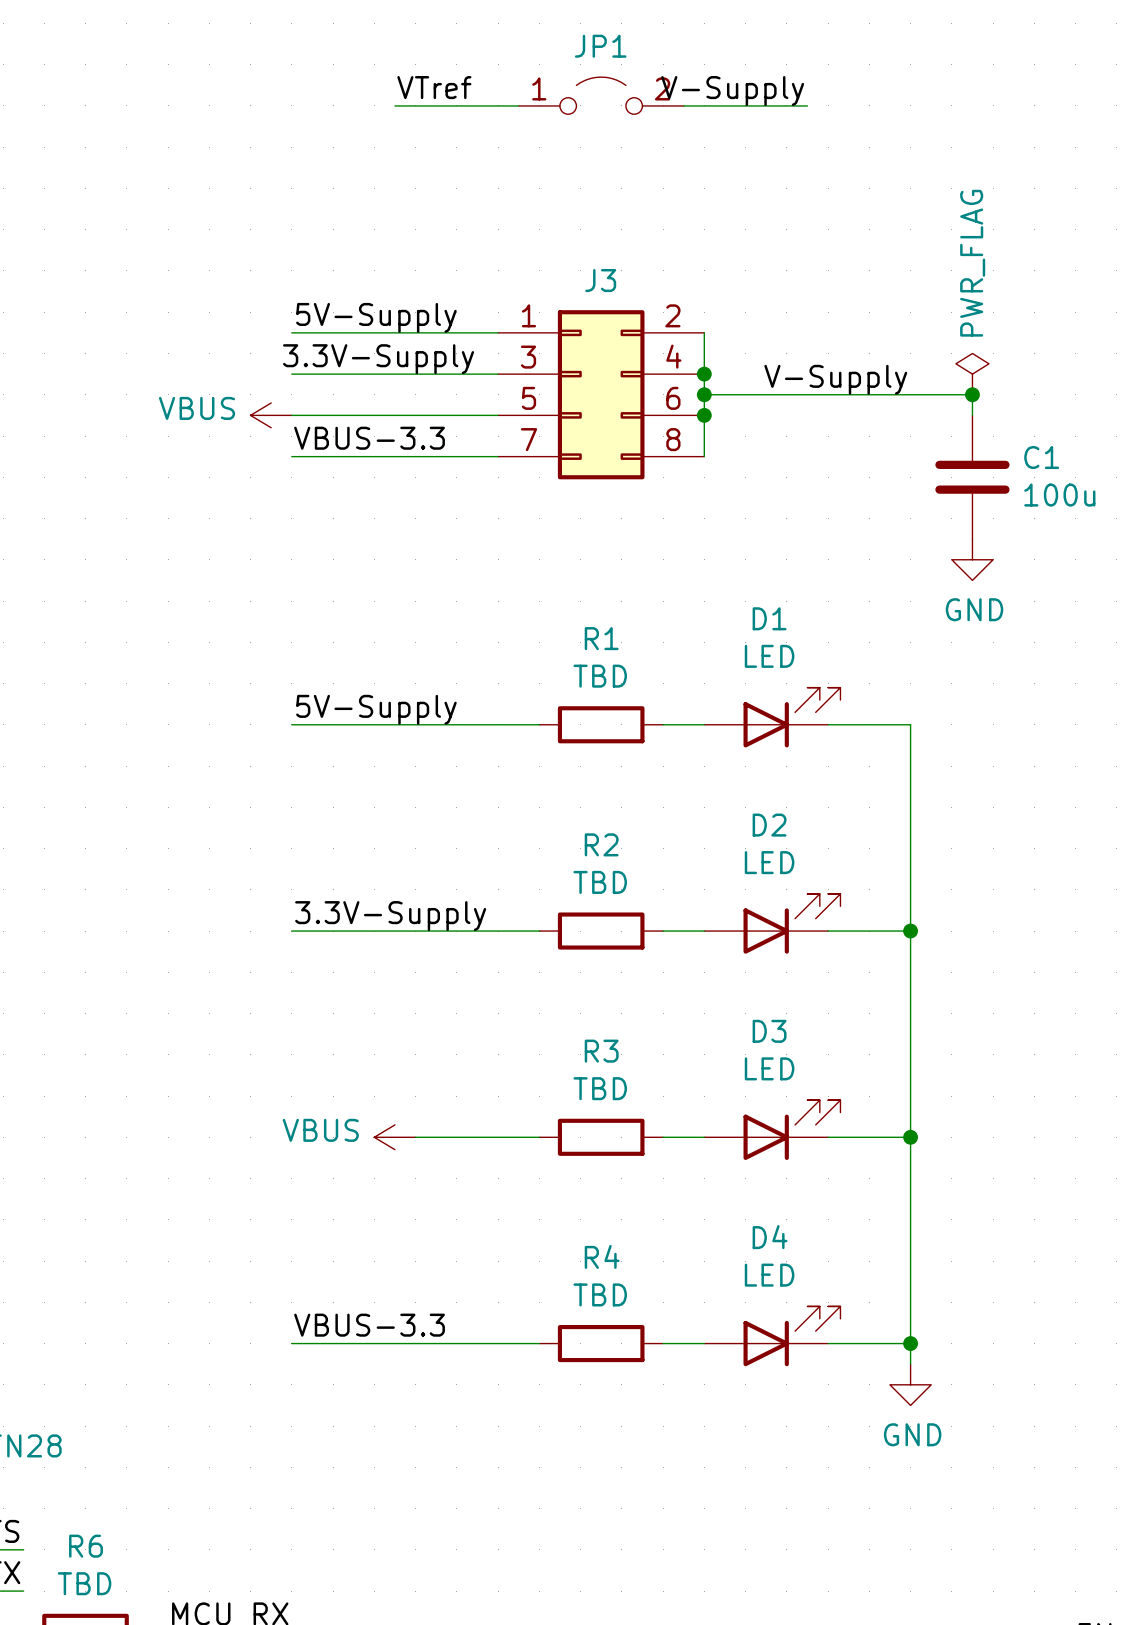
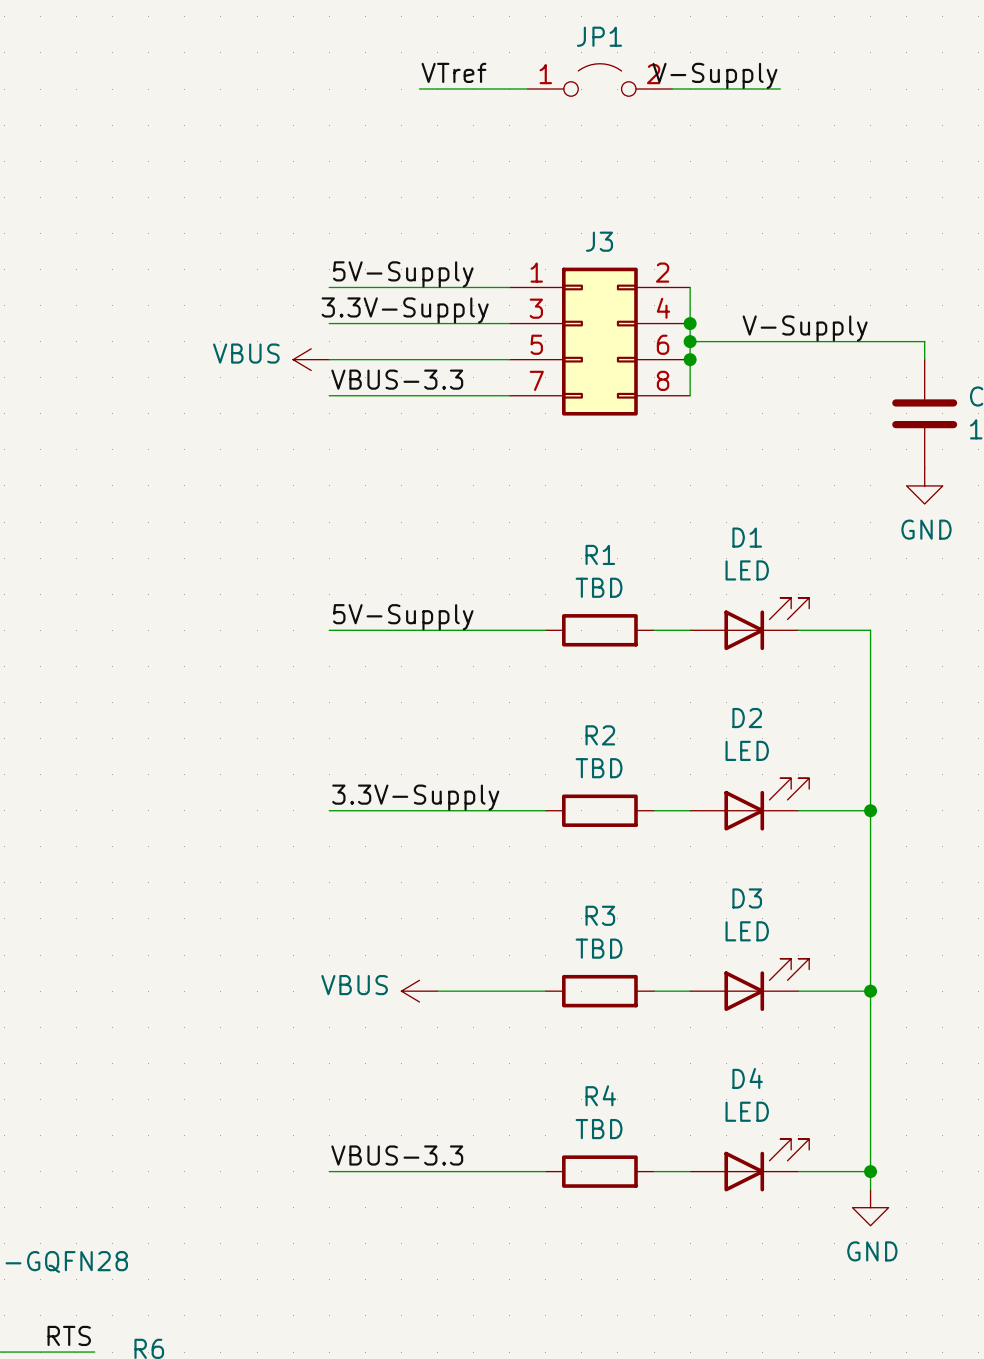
power symbol: PWR_FLAG (972, 374) -> none
junction: (972, 394) -> none

